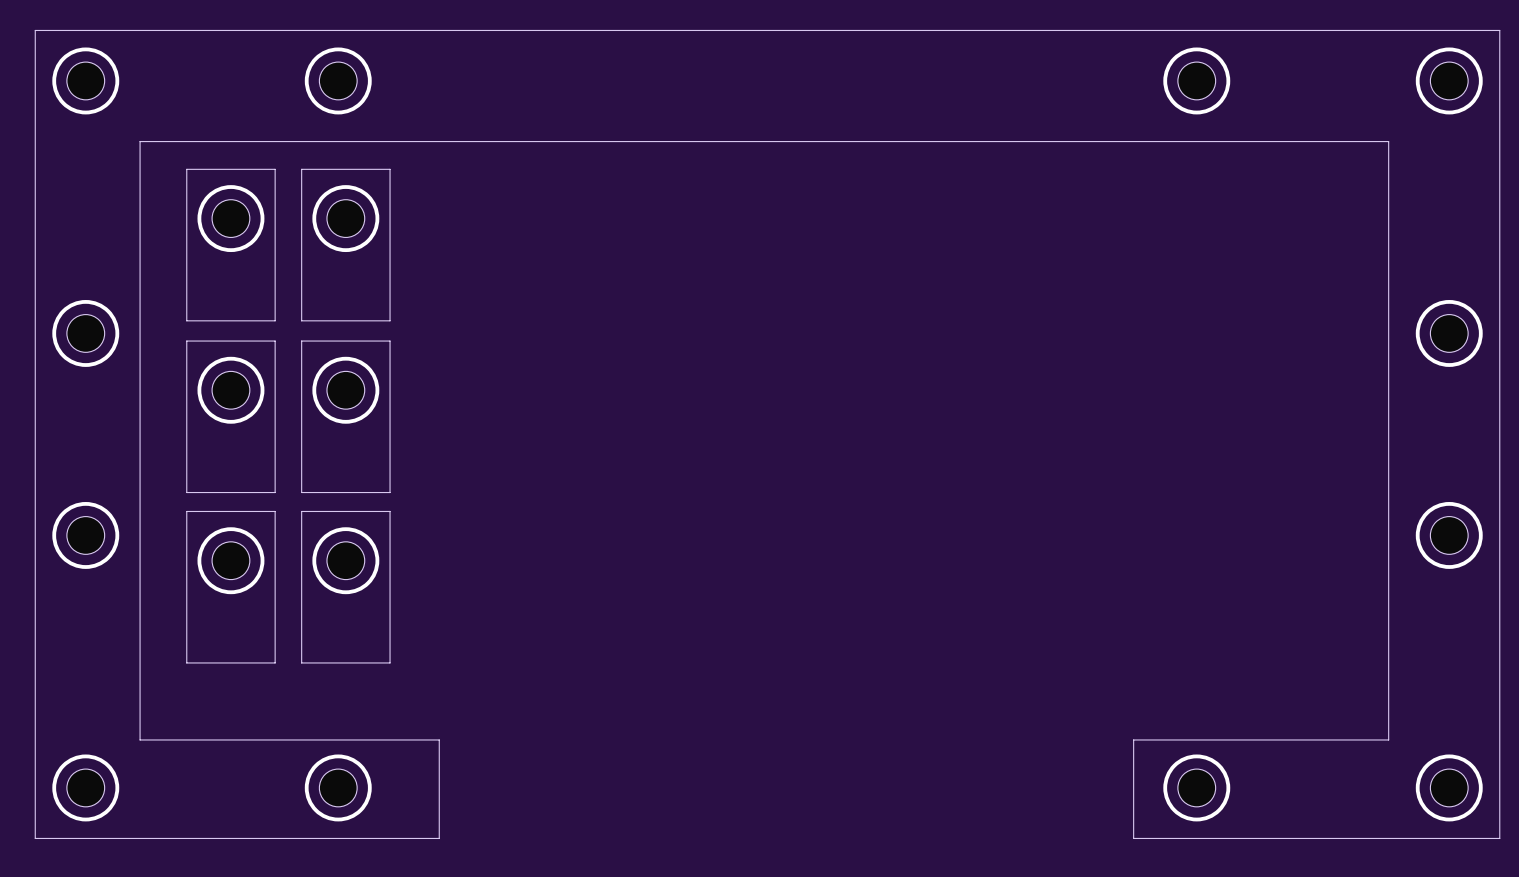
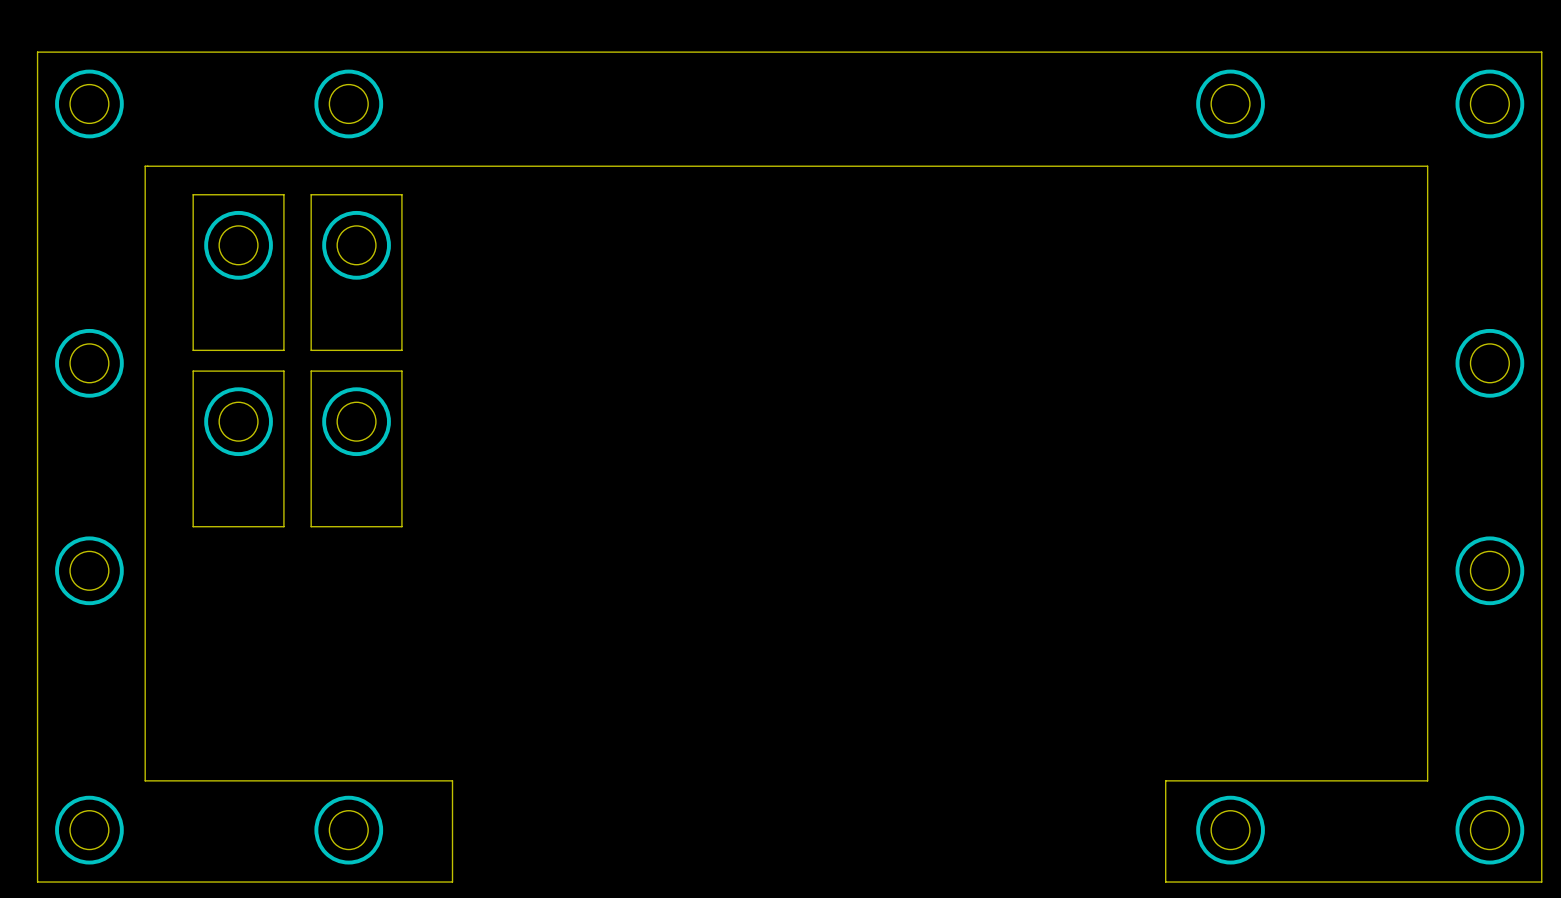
board edge: (186, 511) (275, 511) (275, 662) (186, 662) (186, 511) -> none
board edge: (301, 511) (390, 511) (390, 662) (301, 662) (301, 511) -> none
part: (230, 560) -> none
part: (345, 560) -> none

